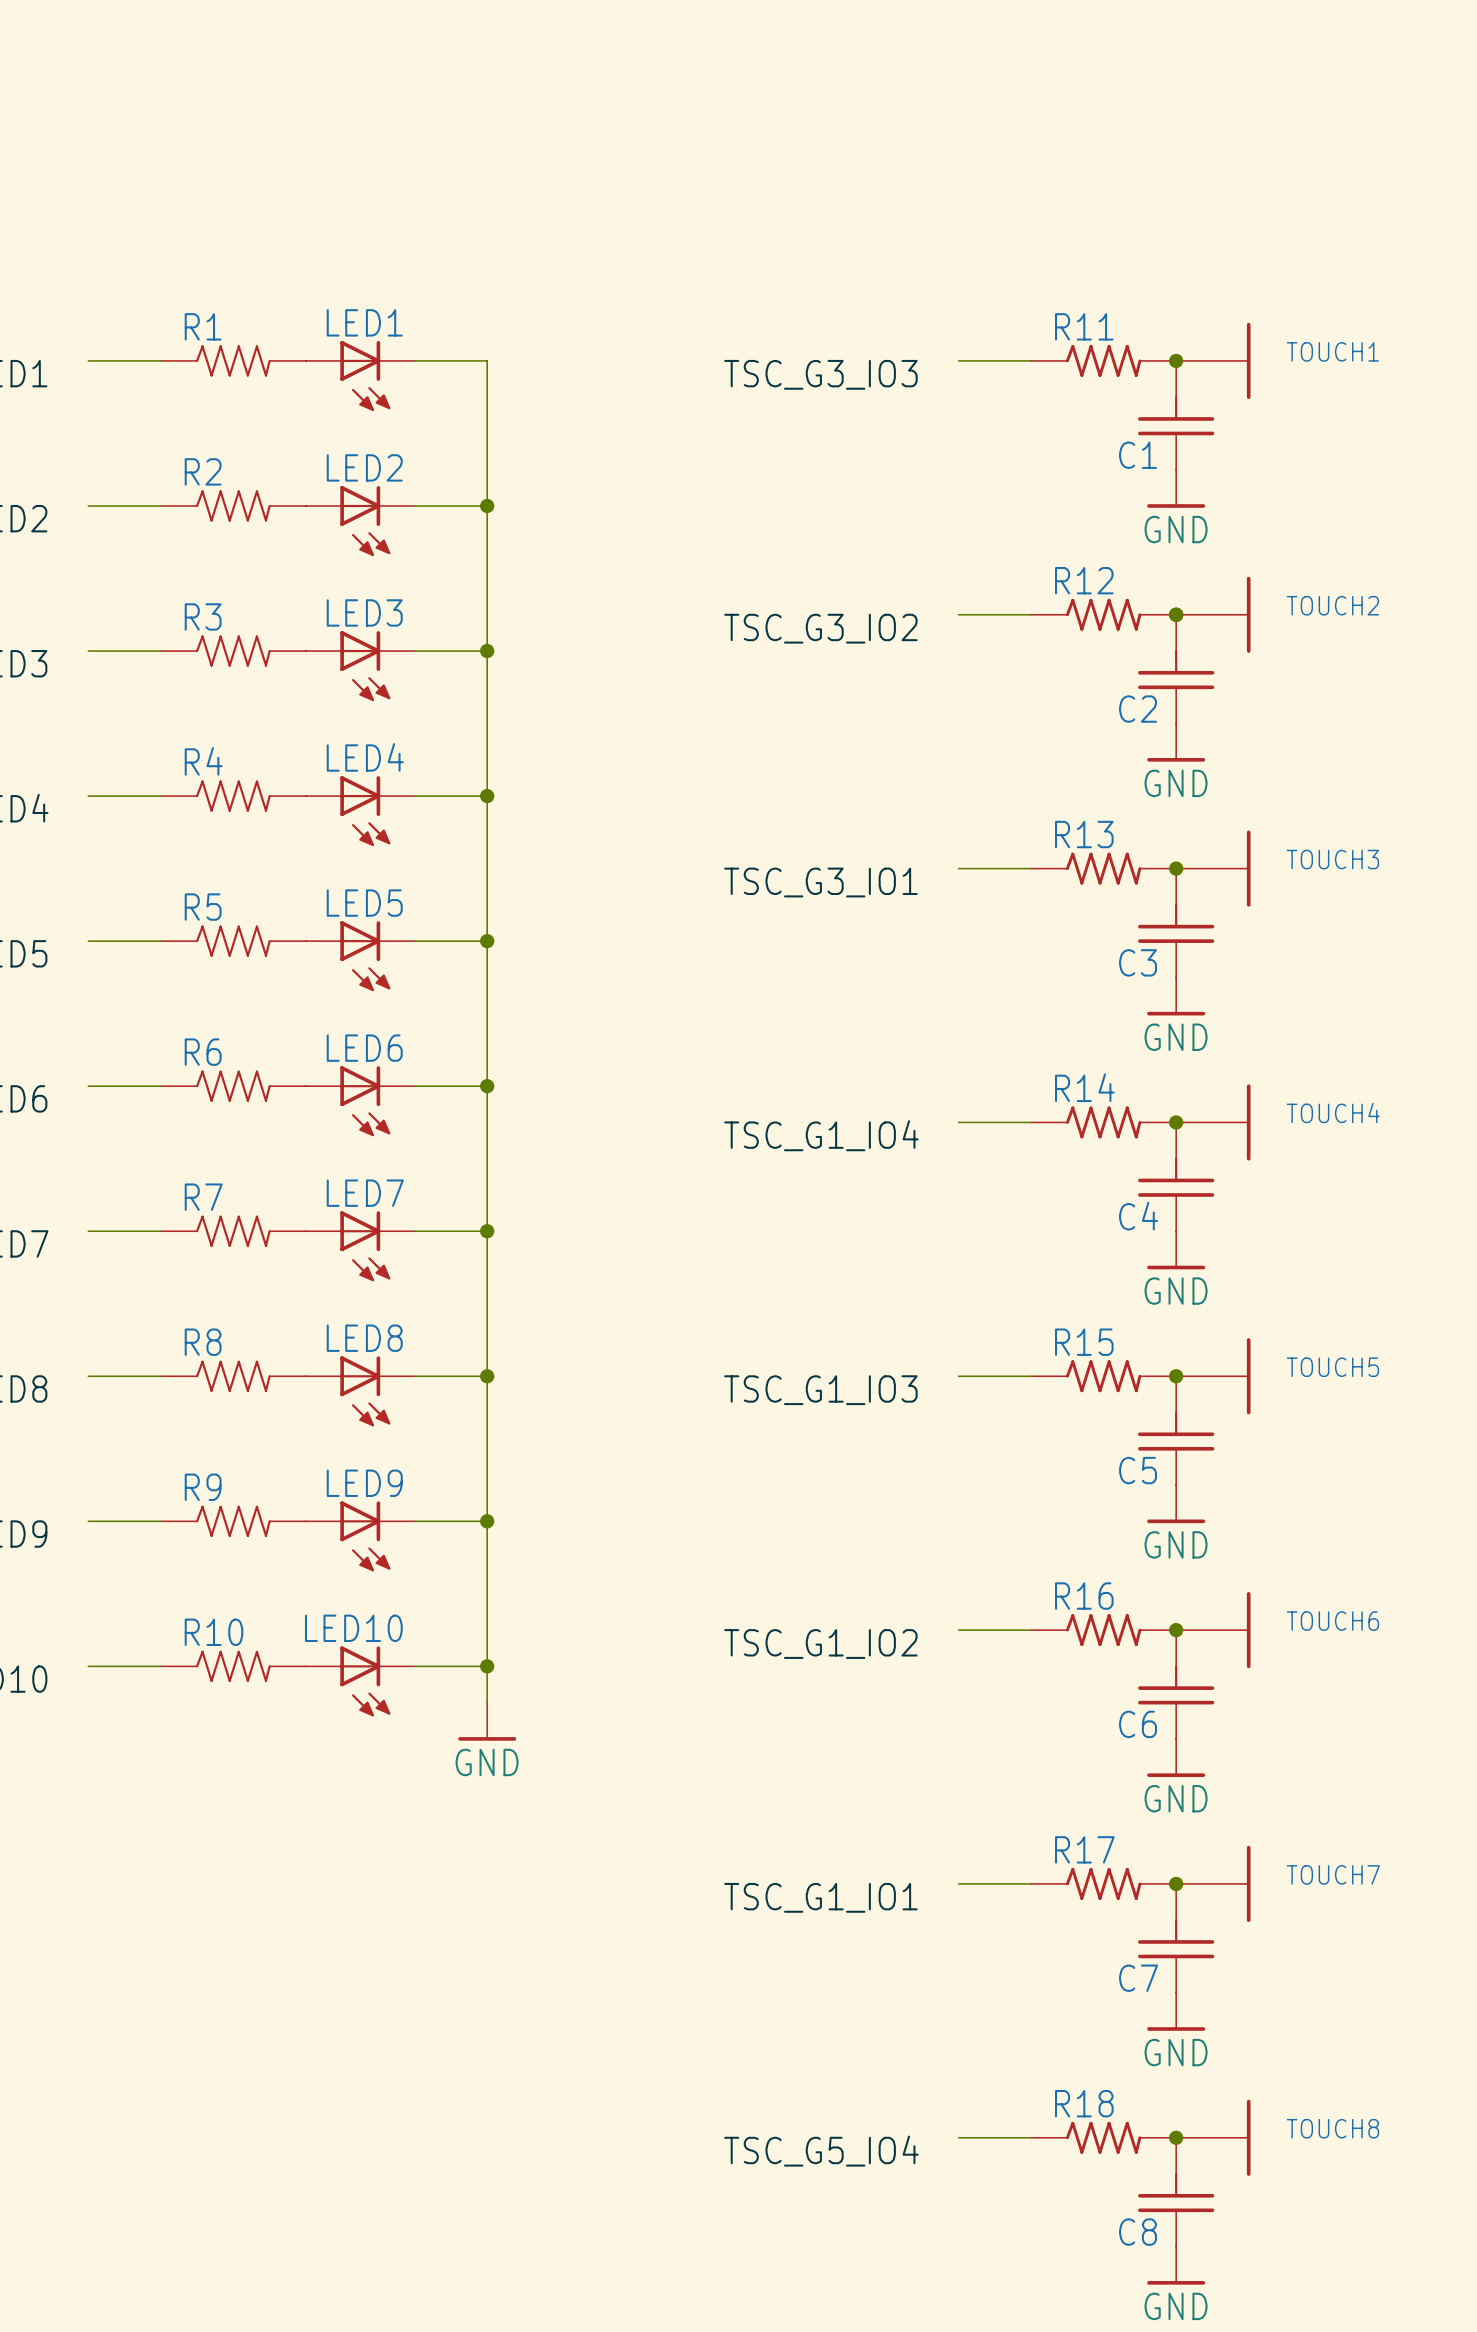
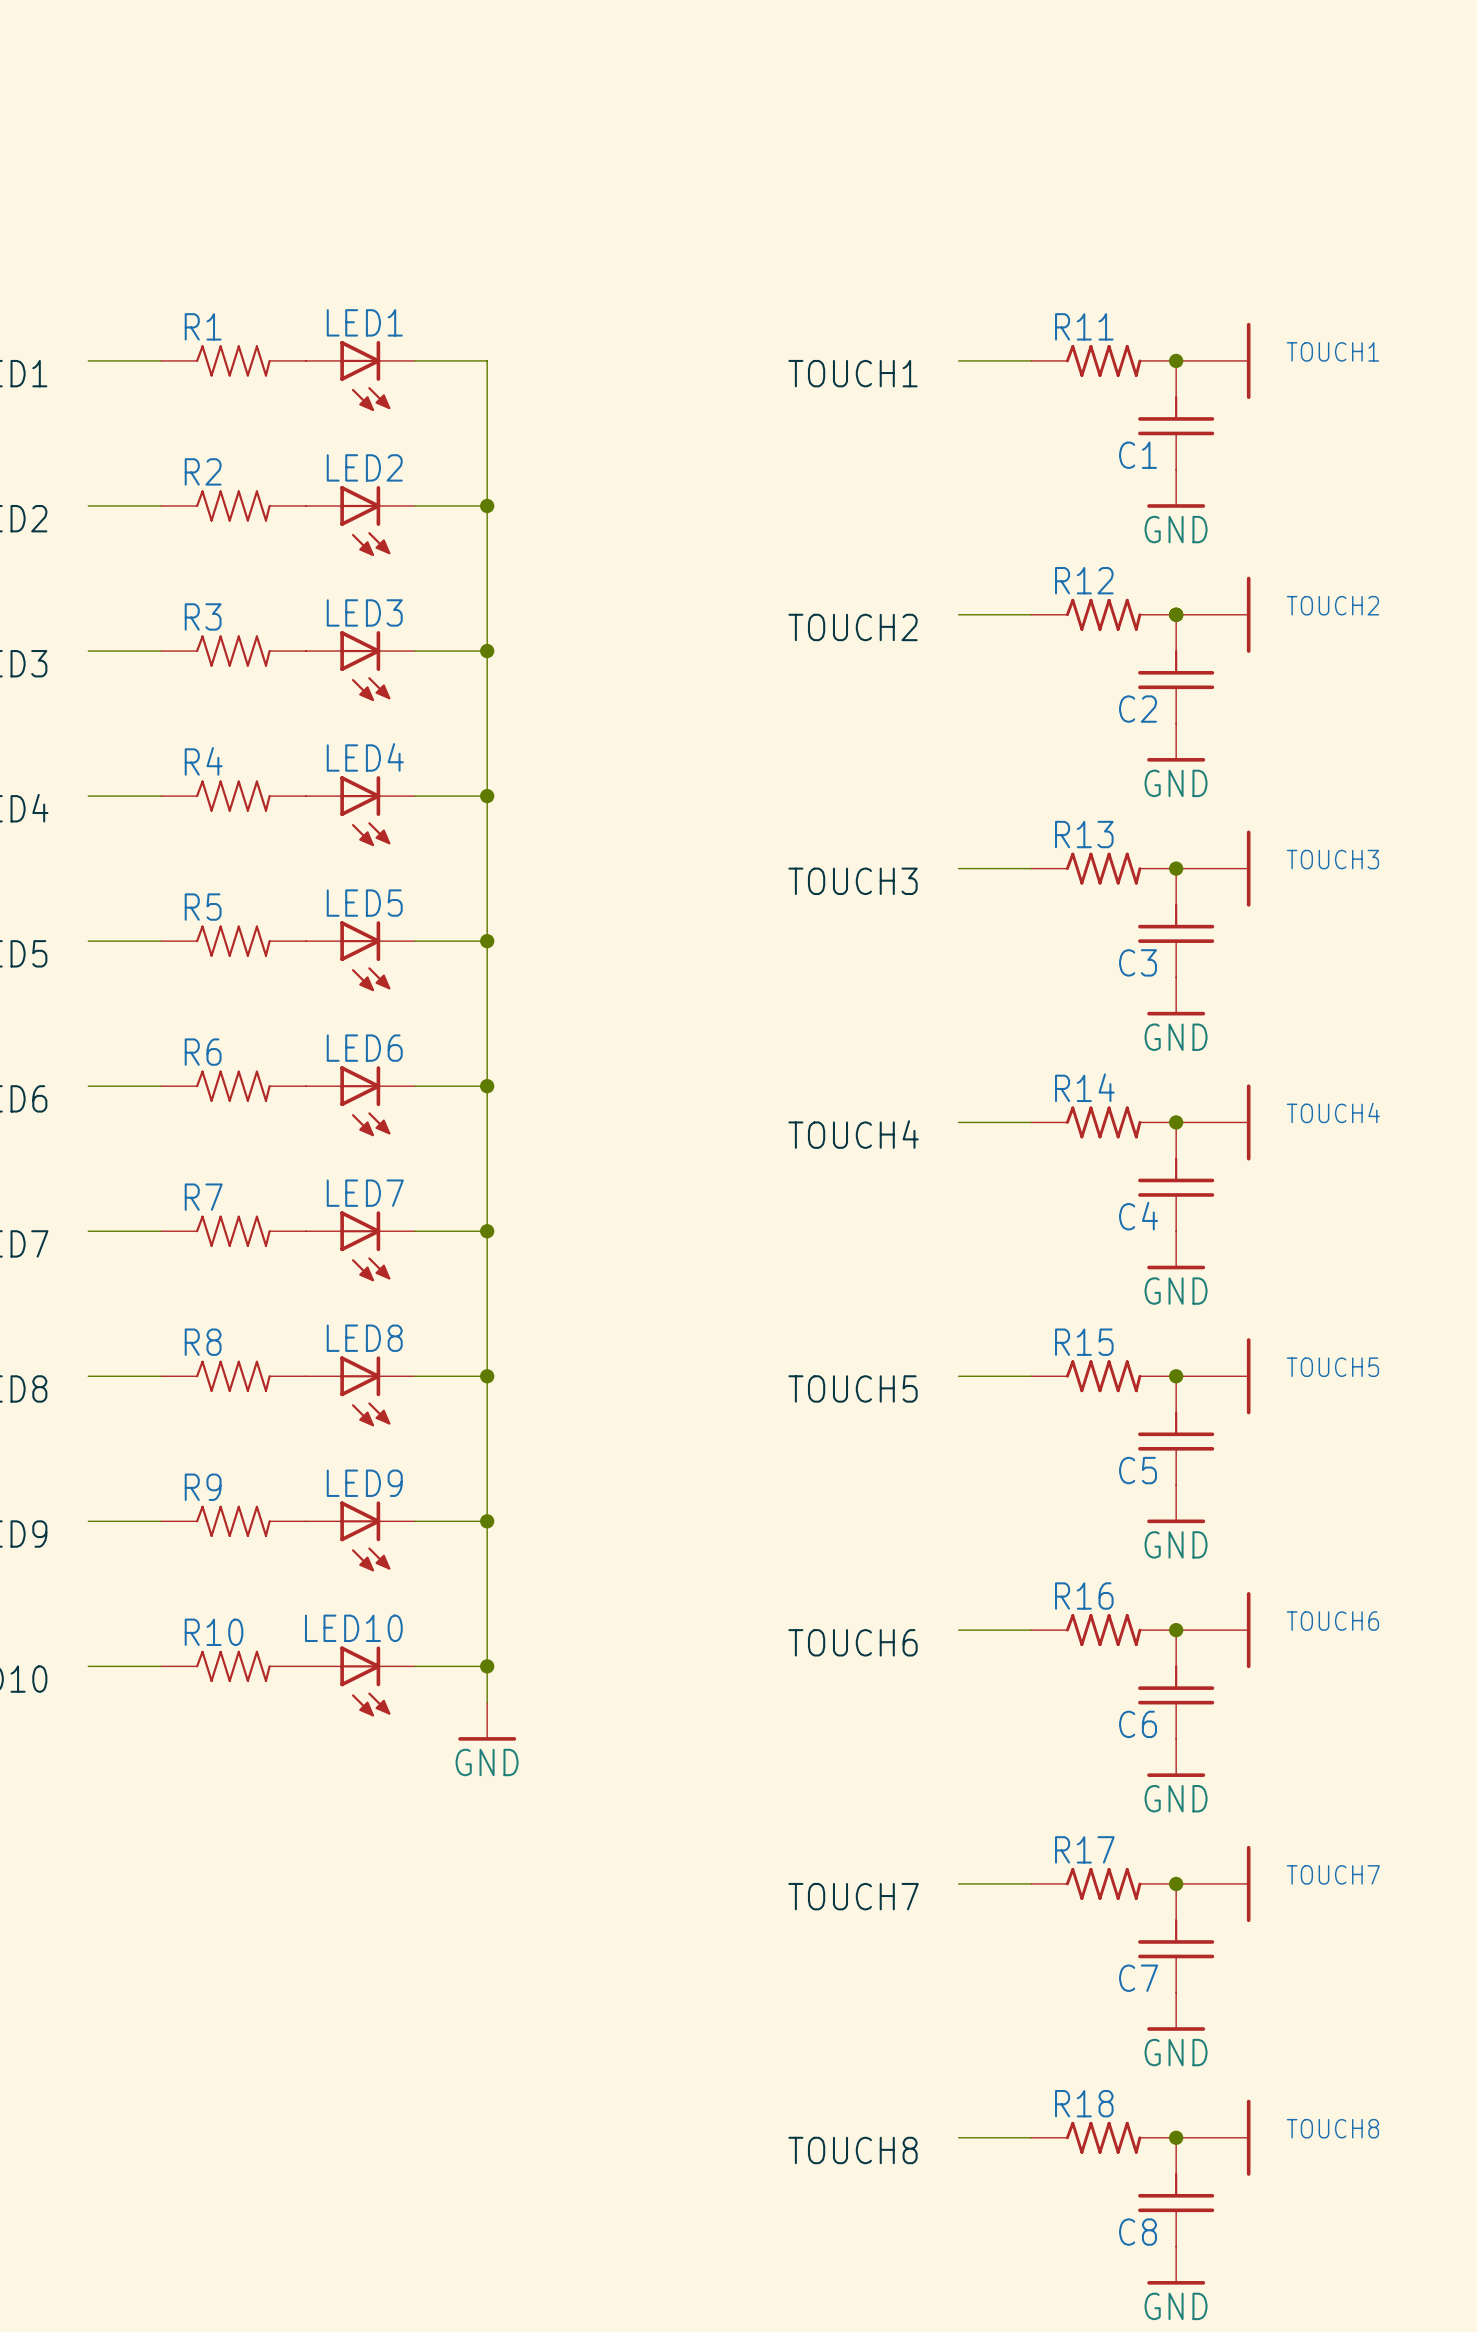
label: TSC_G3_IO3 (820, 374) -> TOUCH1 (853, 373)
label: TSC_G3_IO2 (820, 628) -> TOUCH2 (853, 627)
label: TSC_G3_IO1 (820, 882) -> TOUCH3 (853, 881)
label: TSC_G1_IO4 (821, 1135) -> TOUCH4 (853, 1134)
label: TSC_G1_IO3 (820, 1390) -> TOUCH5 (853, 1388)
label: TSC_G1_IO2 (820, 1644) -> TOUCH6 (853, 1642)
label: TSC_G1_IO1 (820, 1897) -> TOUCH7 (853, 1896)
label: TSC_G5_IO4 (821, 2151) -> TOUCH8 (853, 2150)

